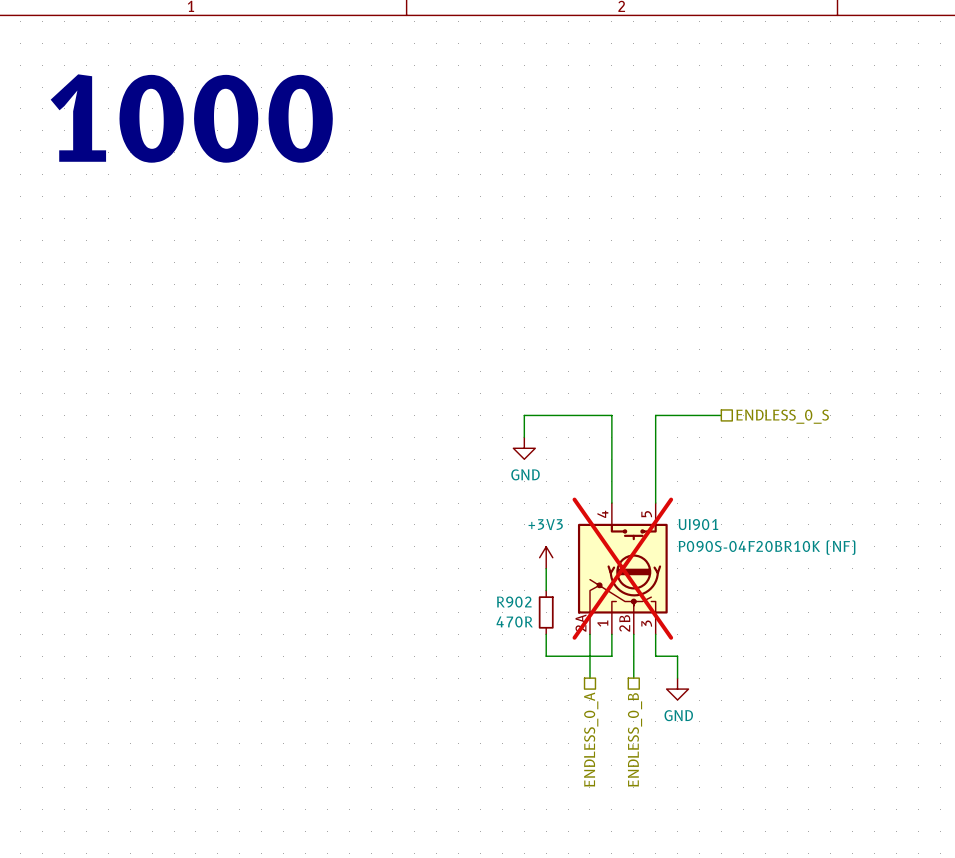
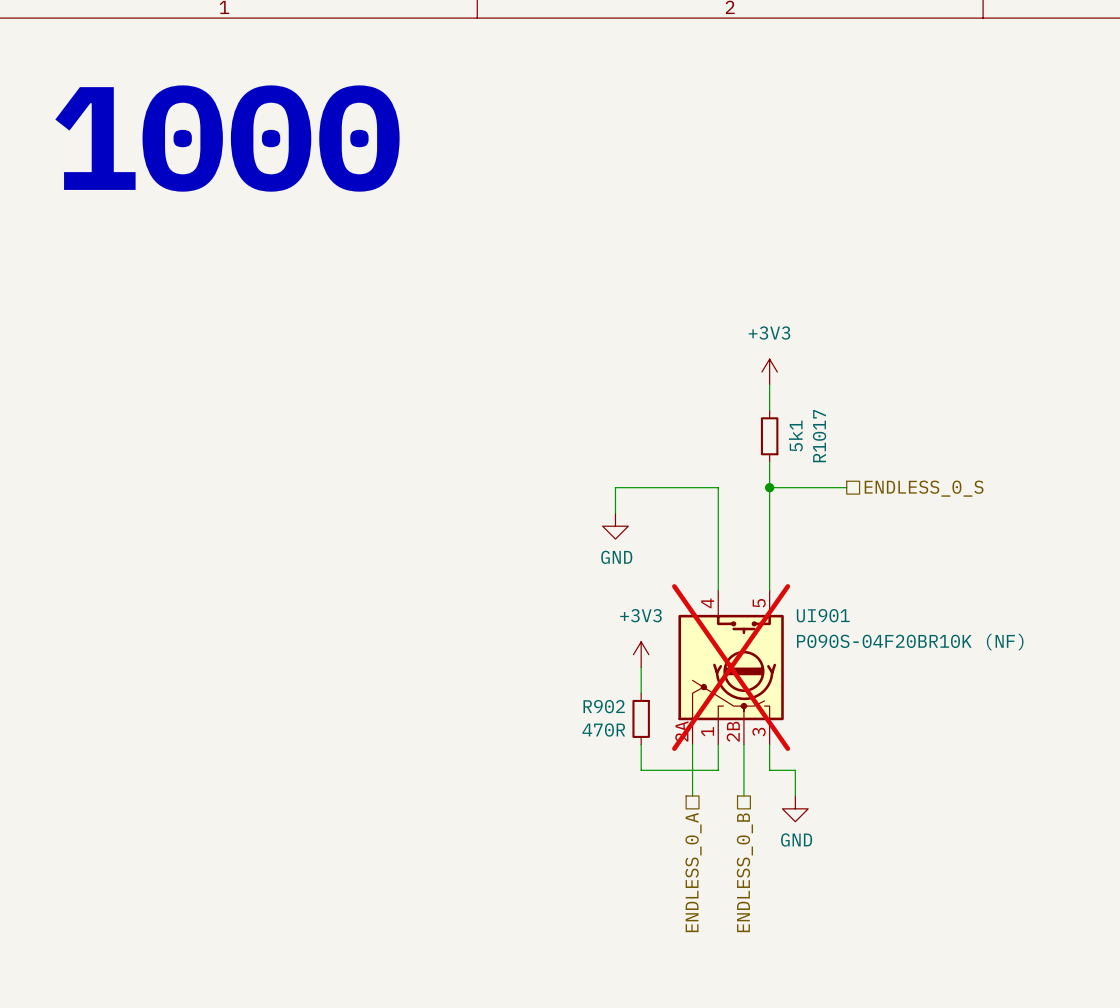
power symbol: none -> +3V3 (769, 372)
wire: none -> (769, 384) (769, 410)
R1017: none -> 5k1 (769, 436)
wire: none -> (769, 461) (769, 487)
junction: none -> (769, 487)

